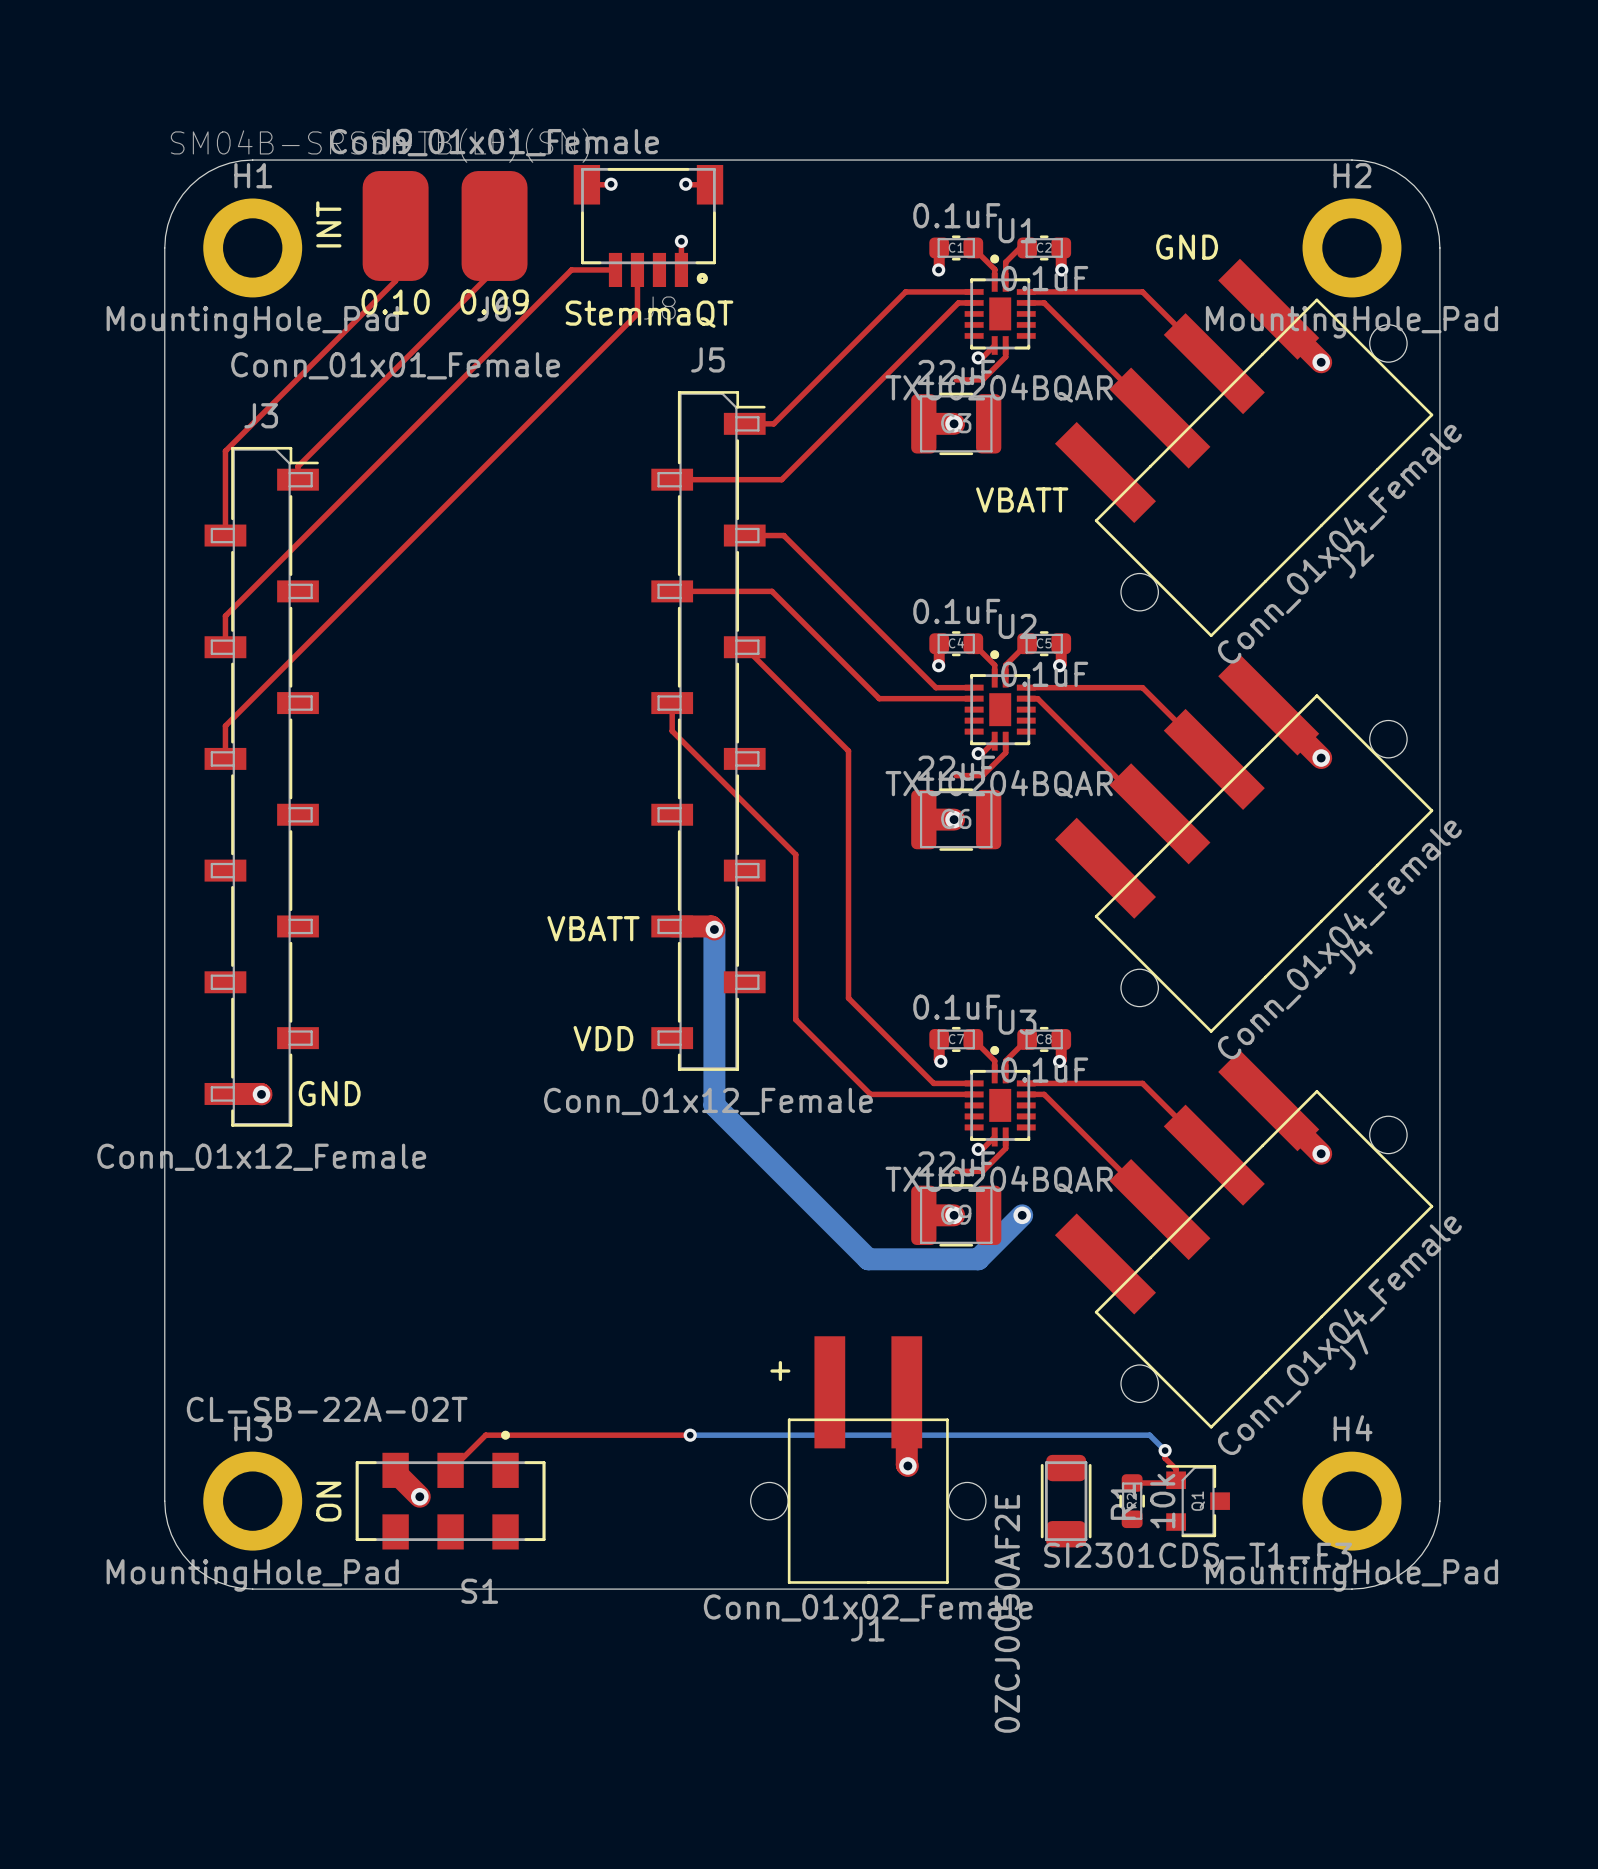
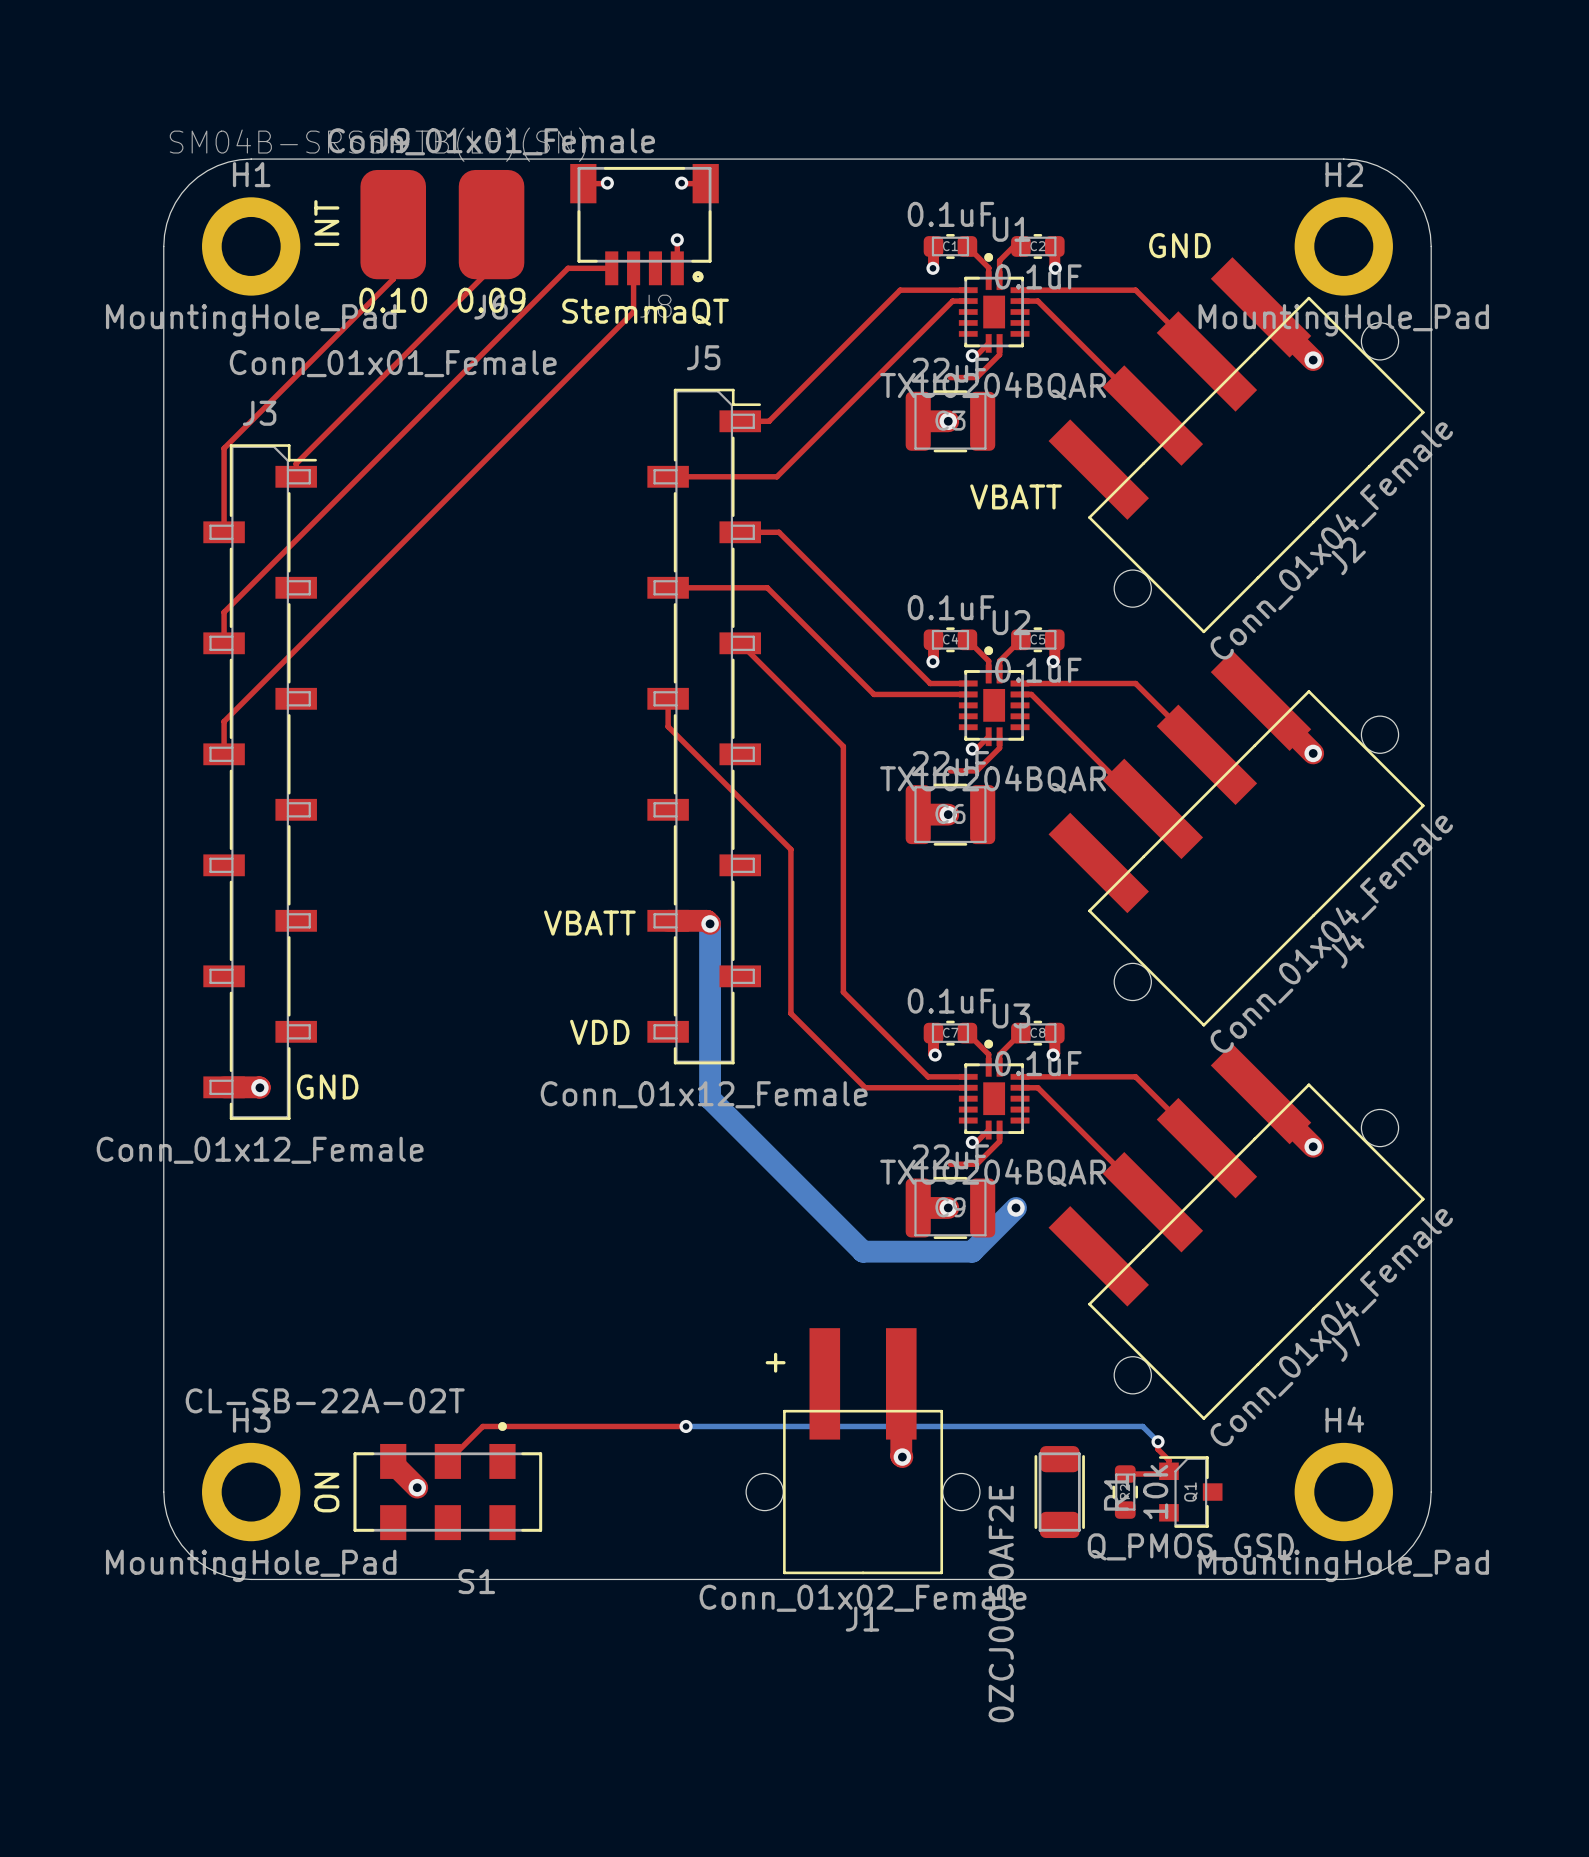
Q1 value: SI2301CDS-T1-E3 (1198, 1555) -> Q_PMOS_GSD (1190, 1546)

